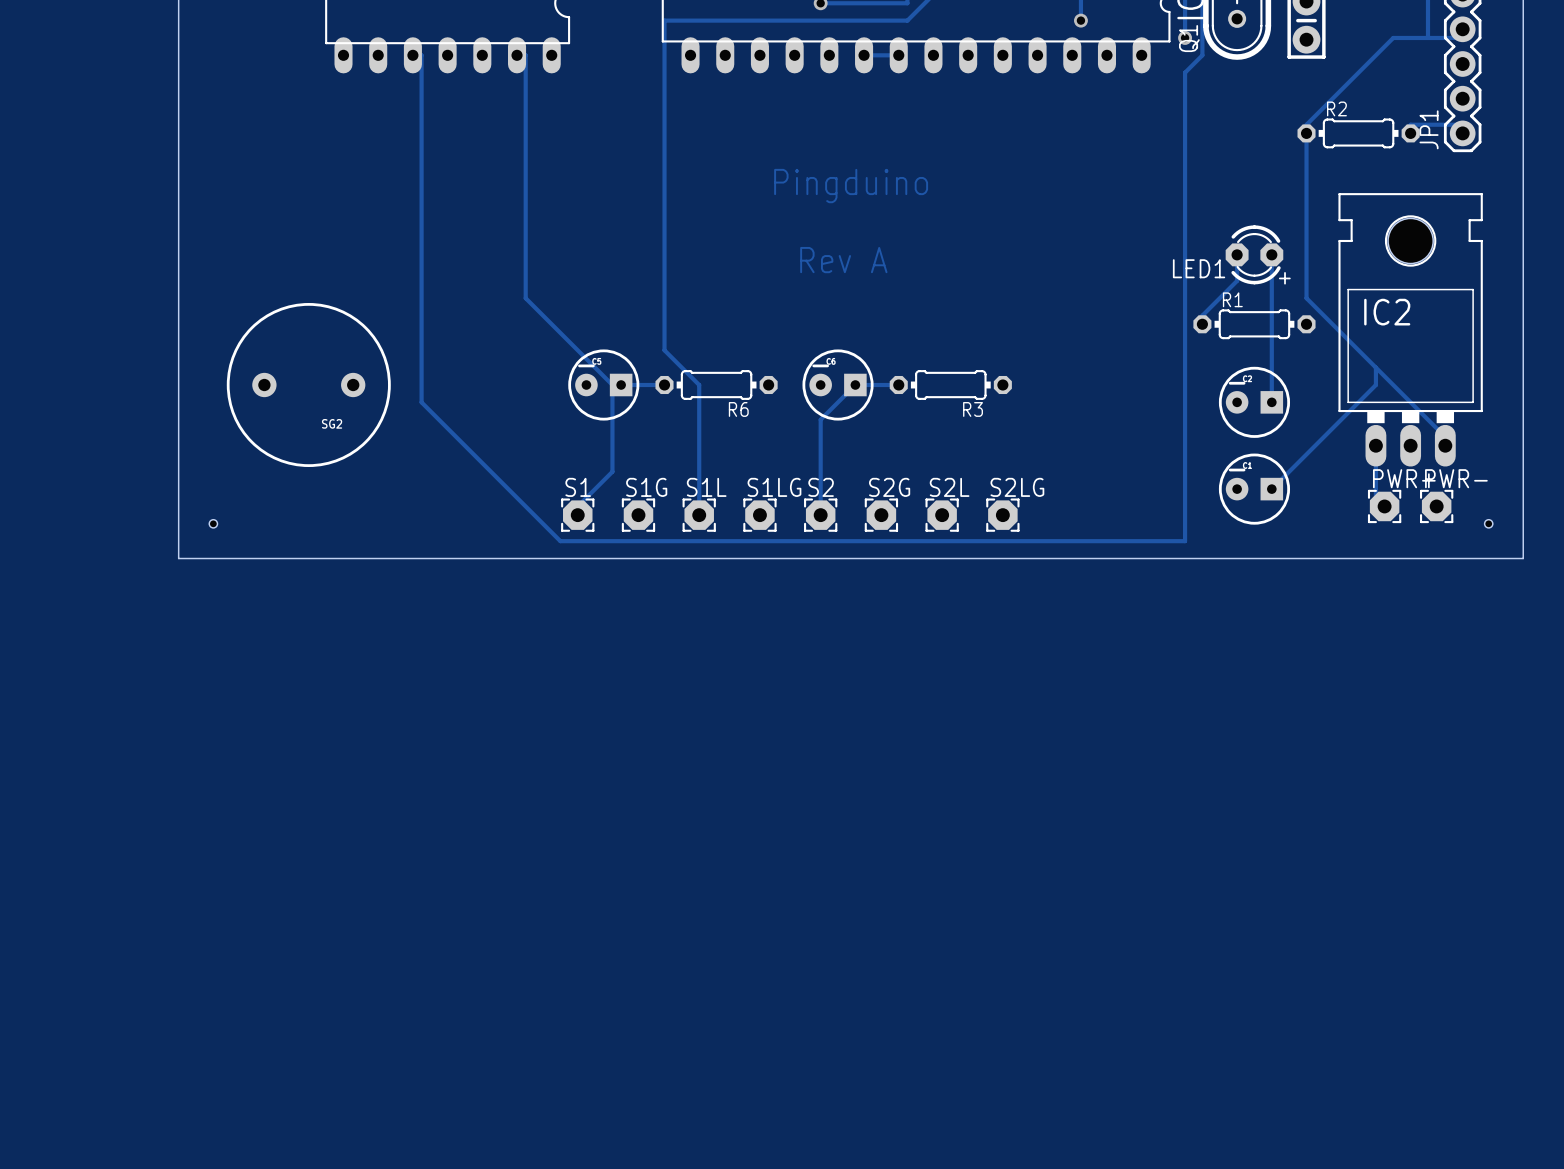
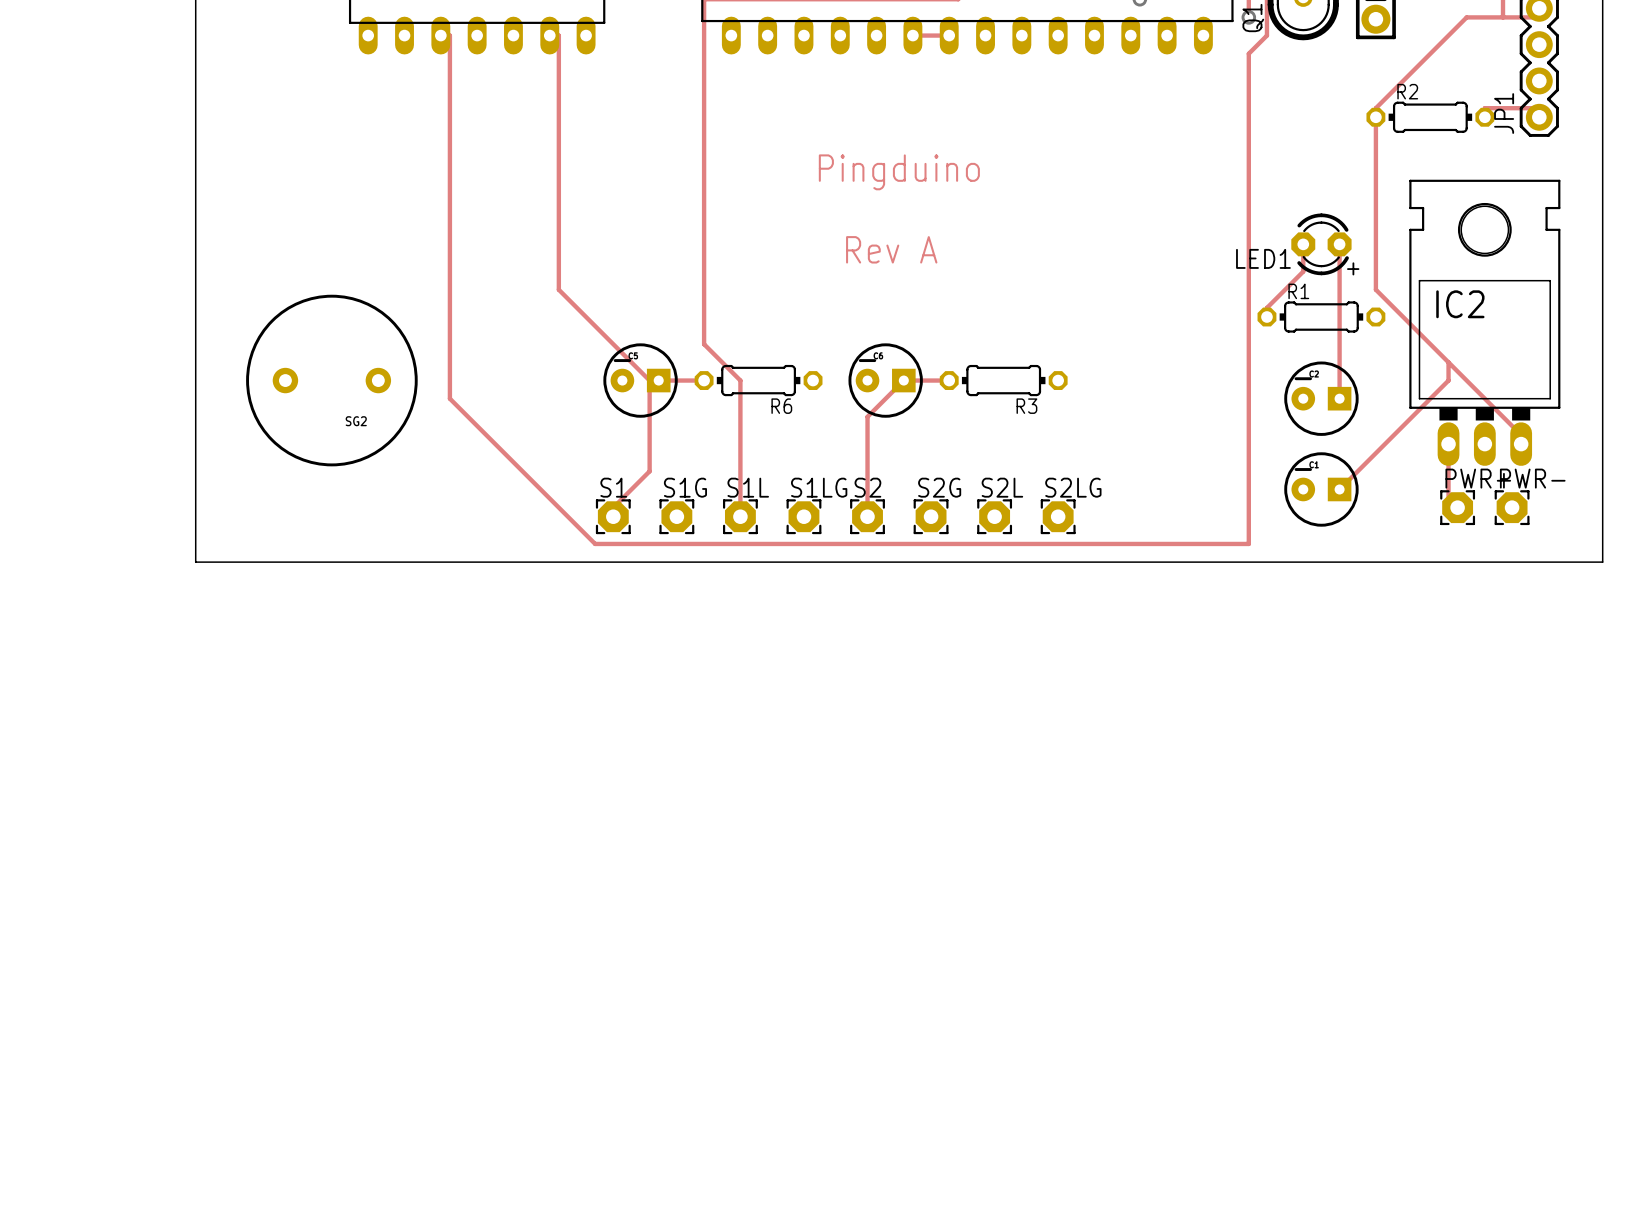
hole: (213, 523) -> none
hole: (1488, 523) -> none

